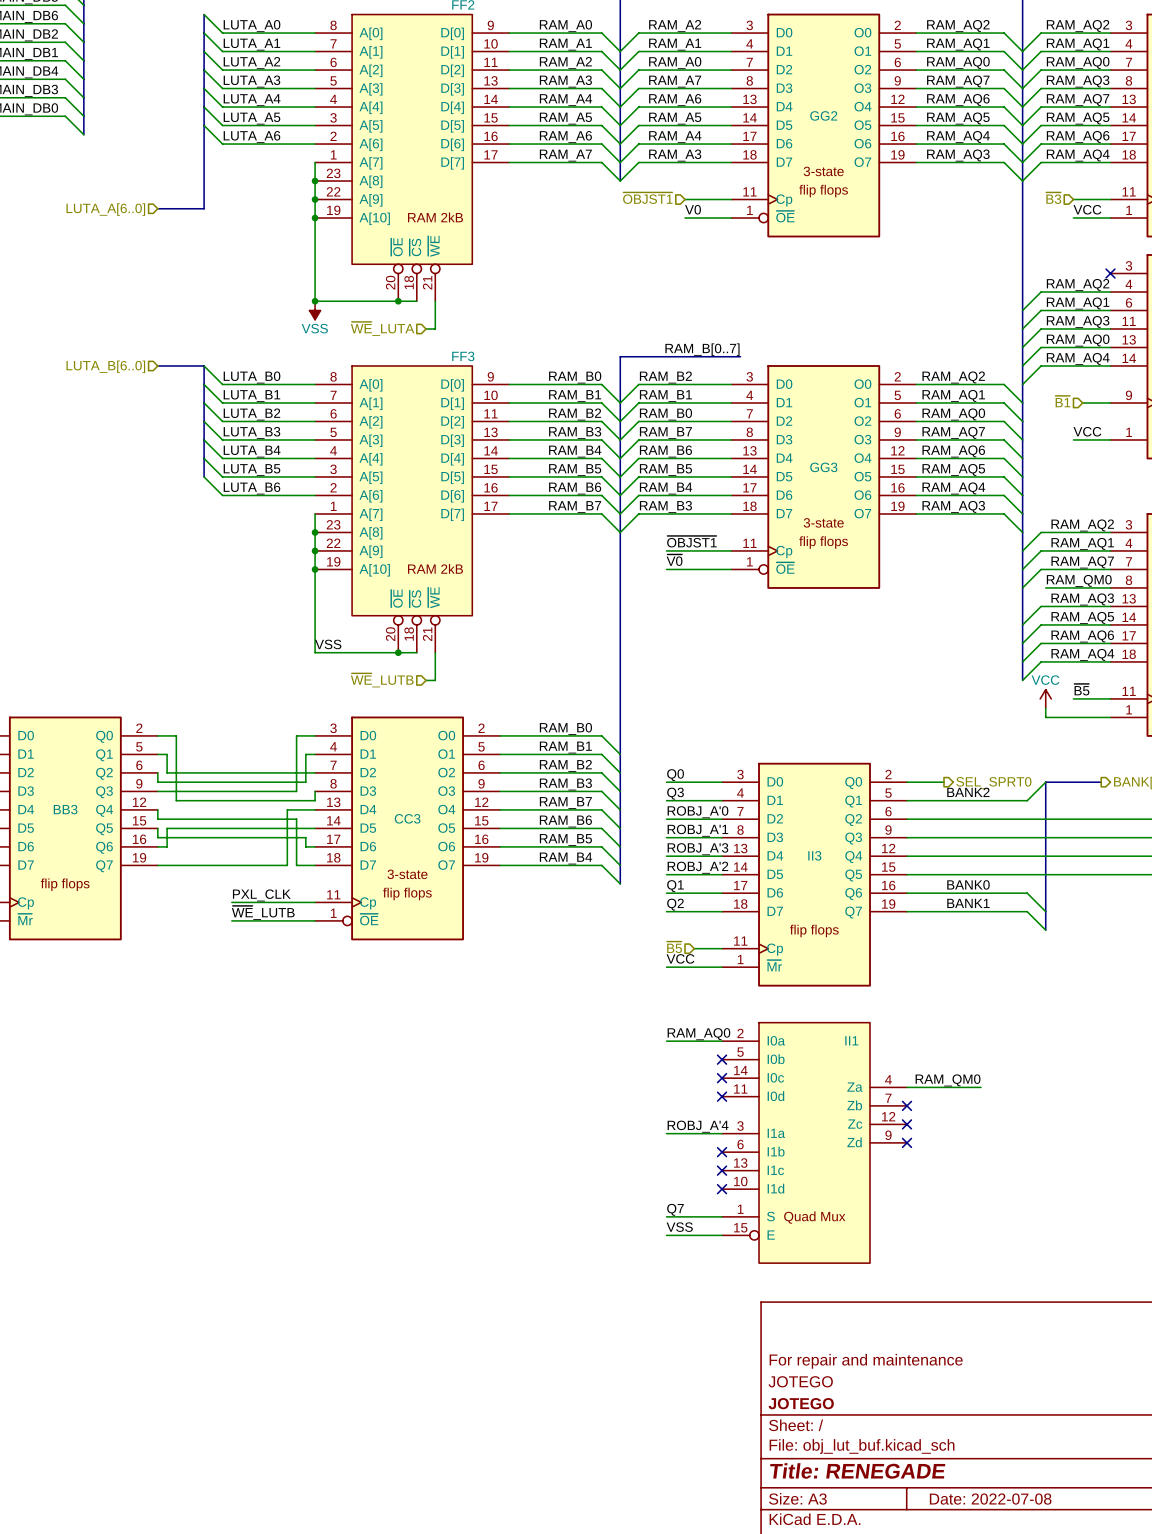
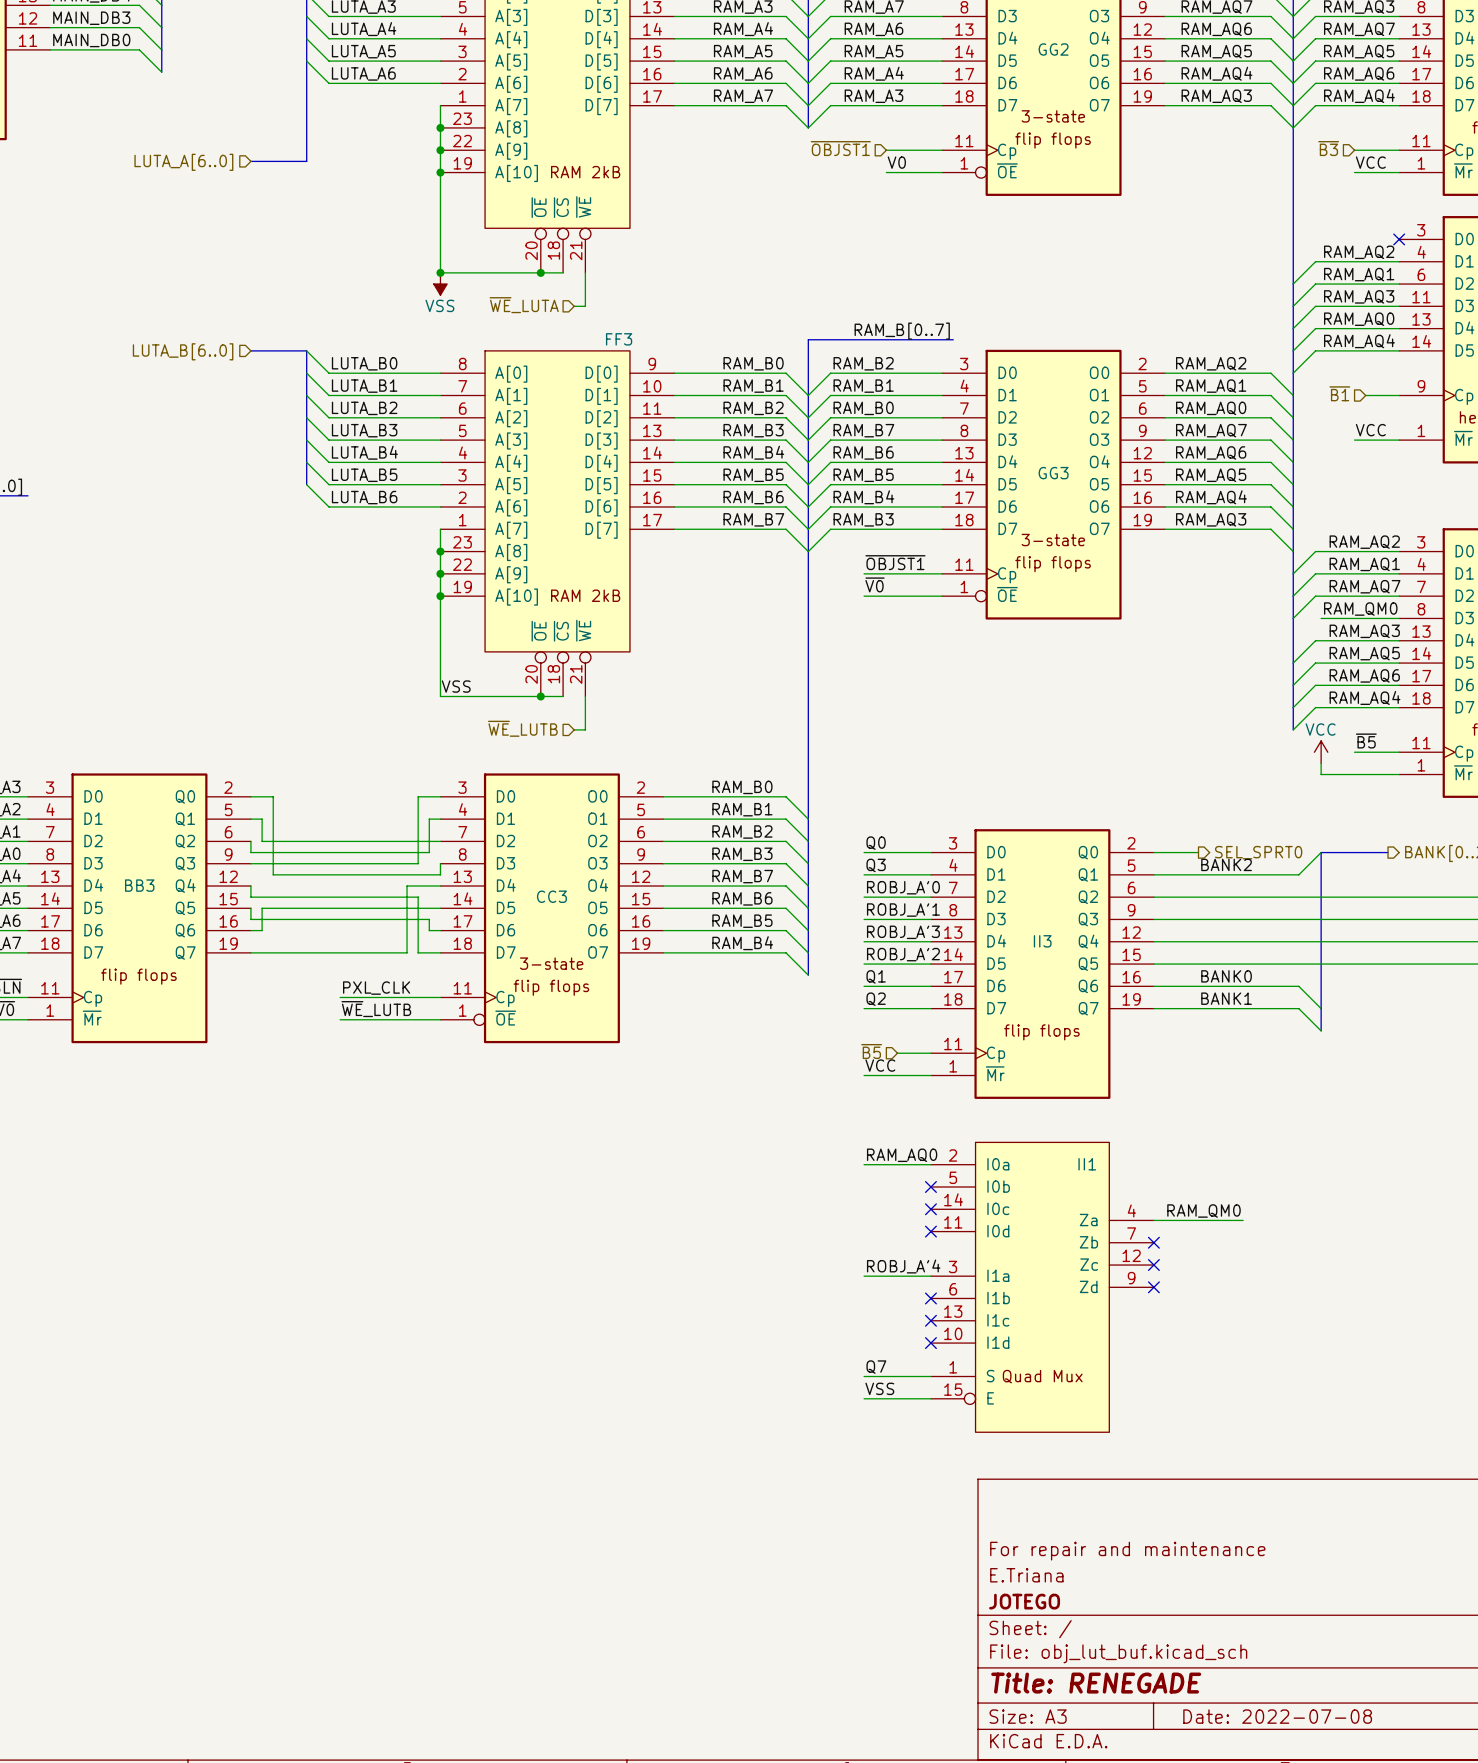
title block: JOTEGO (800, 1381) -> E.Triana (1026, 1575)

